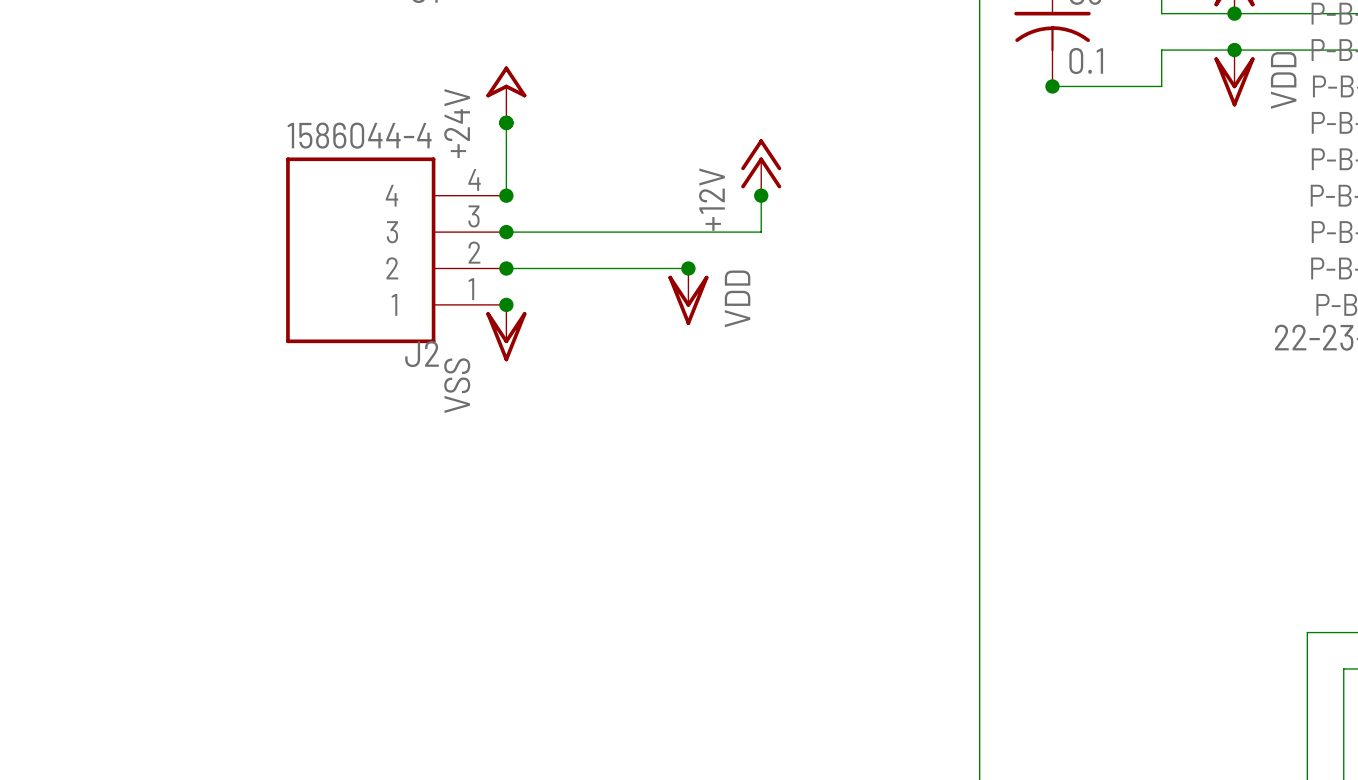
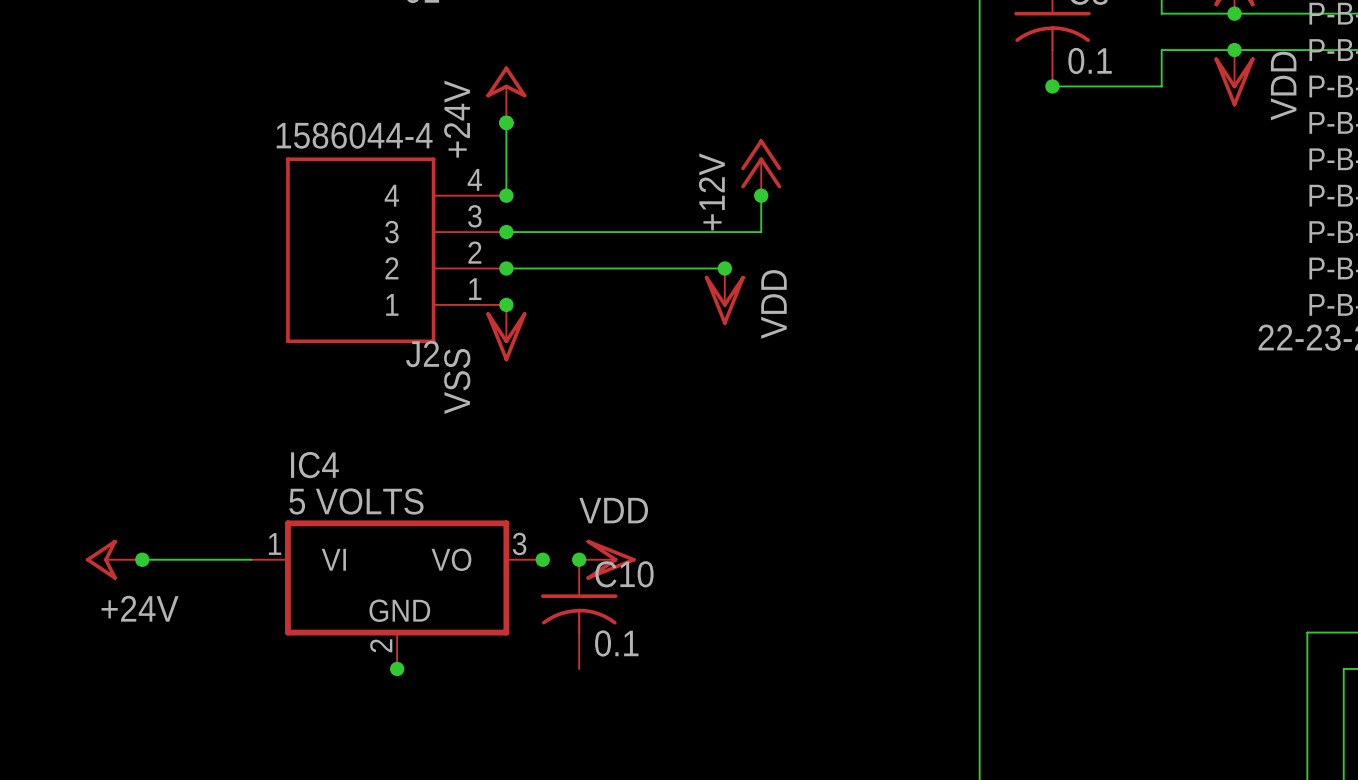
wire: none -> (688, 268) (724, 268)
junction position: (688, 268) -> (724, 268)
power symbol position: VDD (688, 296) -> VDD (724, 296)
power symbol: none -> +24V (114, 559)
wire: none -> (142, 559) (251, 559)
junction: none -> (142, 559)
junction: none -> (542, 559)
junction: none -> (579, 559)
power symbol: none -> VDD (607, 559)
IC4: none -> 5 VOLTS (397, 594)
C10: none -> 0.1 (579, 614)
junction: none -> (397, 668)

